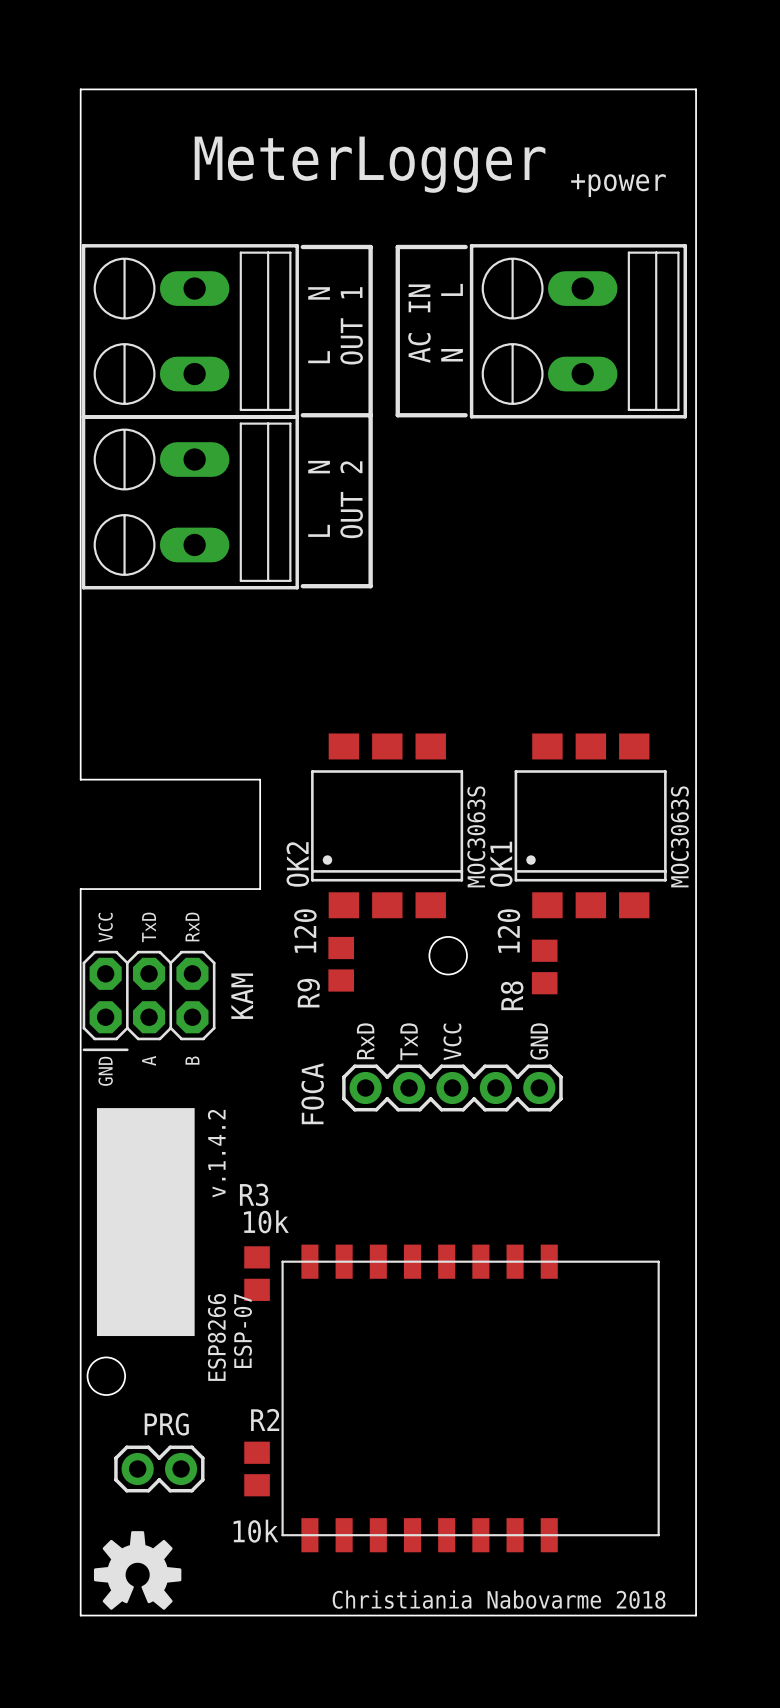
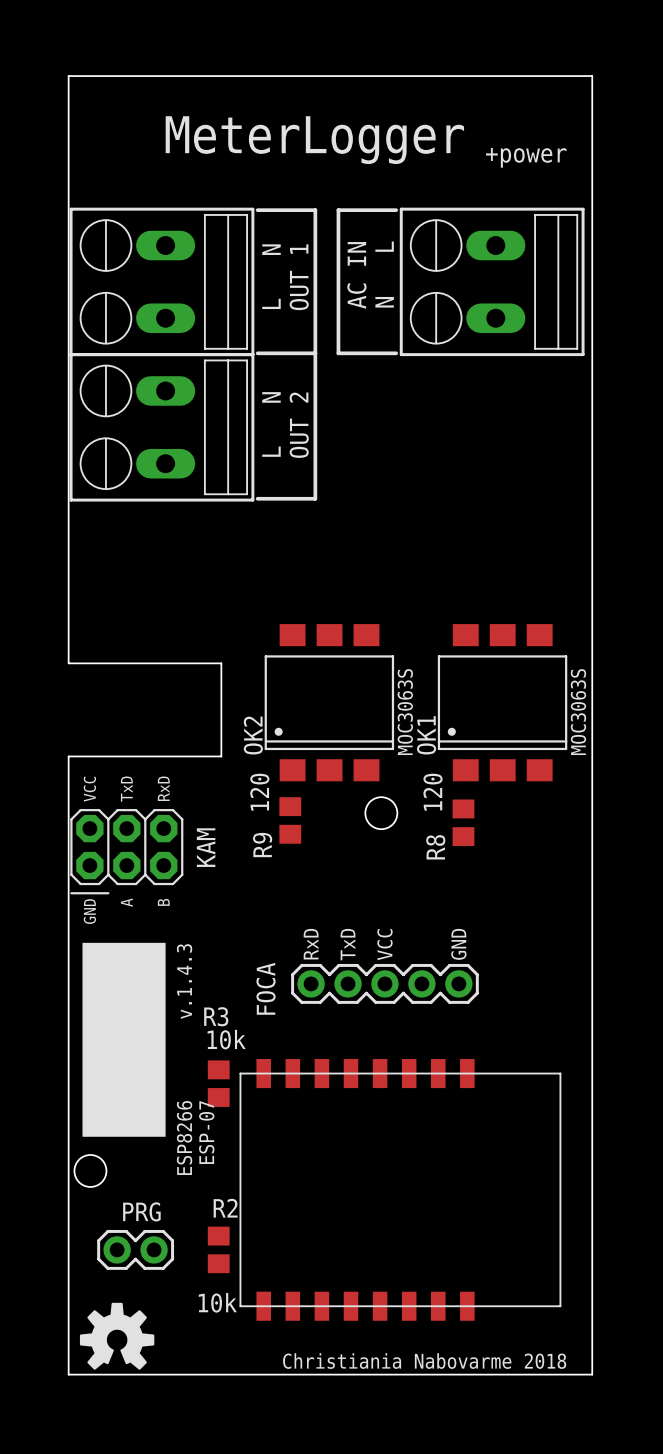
text position: RxD (365, 1041) -> RxD (311, 944)
text position: TxD (409, 1041) -> TxD (348, 944)
text position: VCC (452, 1041) -> VCC (384, 944)
text position: GND (539, 1041) -> GND (458, 944)
FOCA position: (452, 1088) -> (384, 983)
text: v.1.4.2 (216, 1153) -> v.1.4.3 (184, 981)

